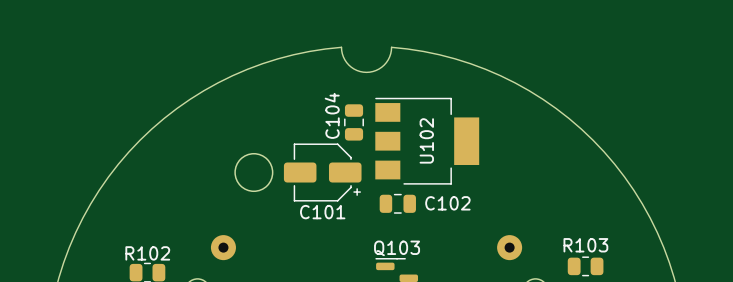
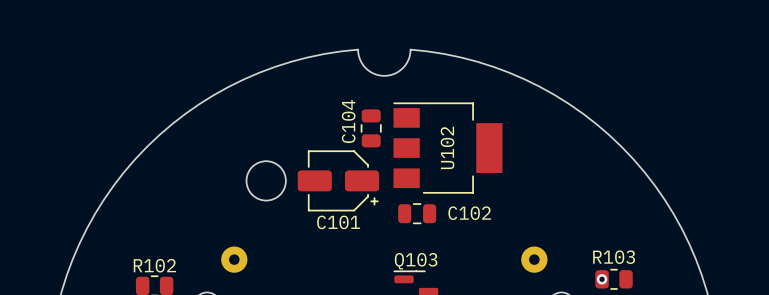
via: none -> (602, 279)

